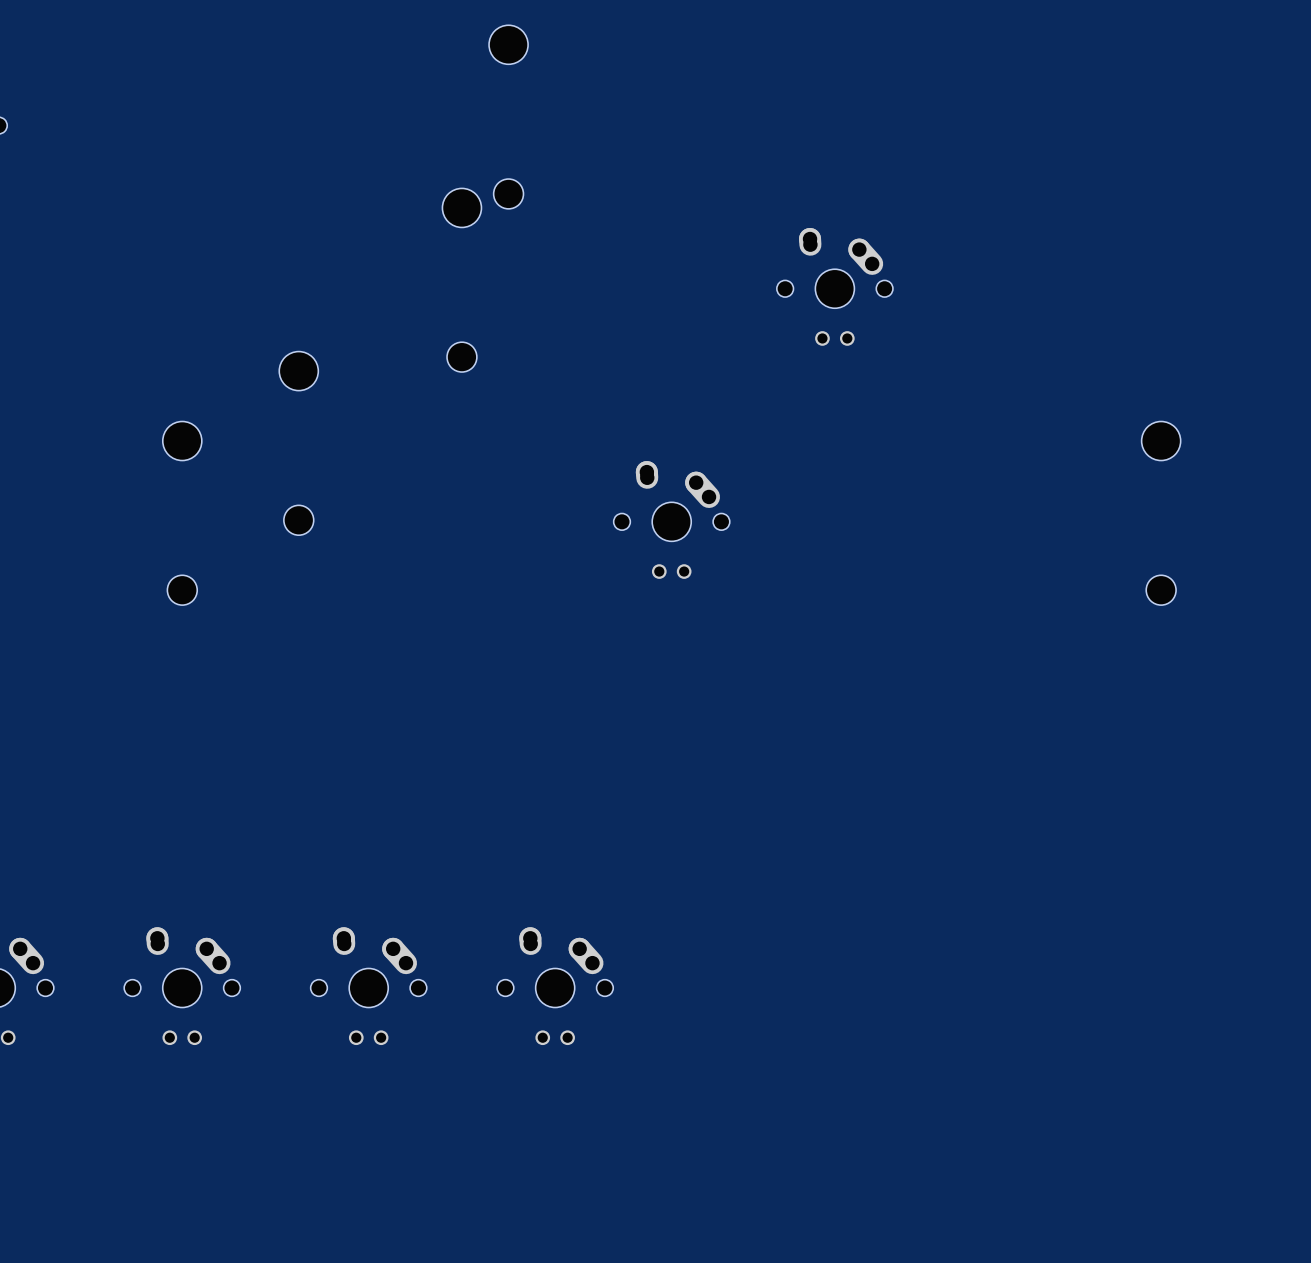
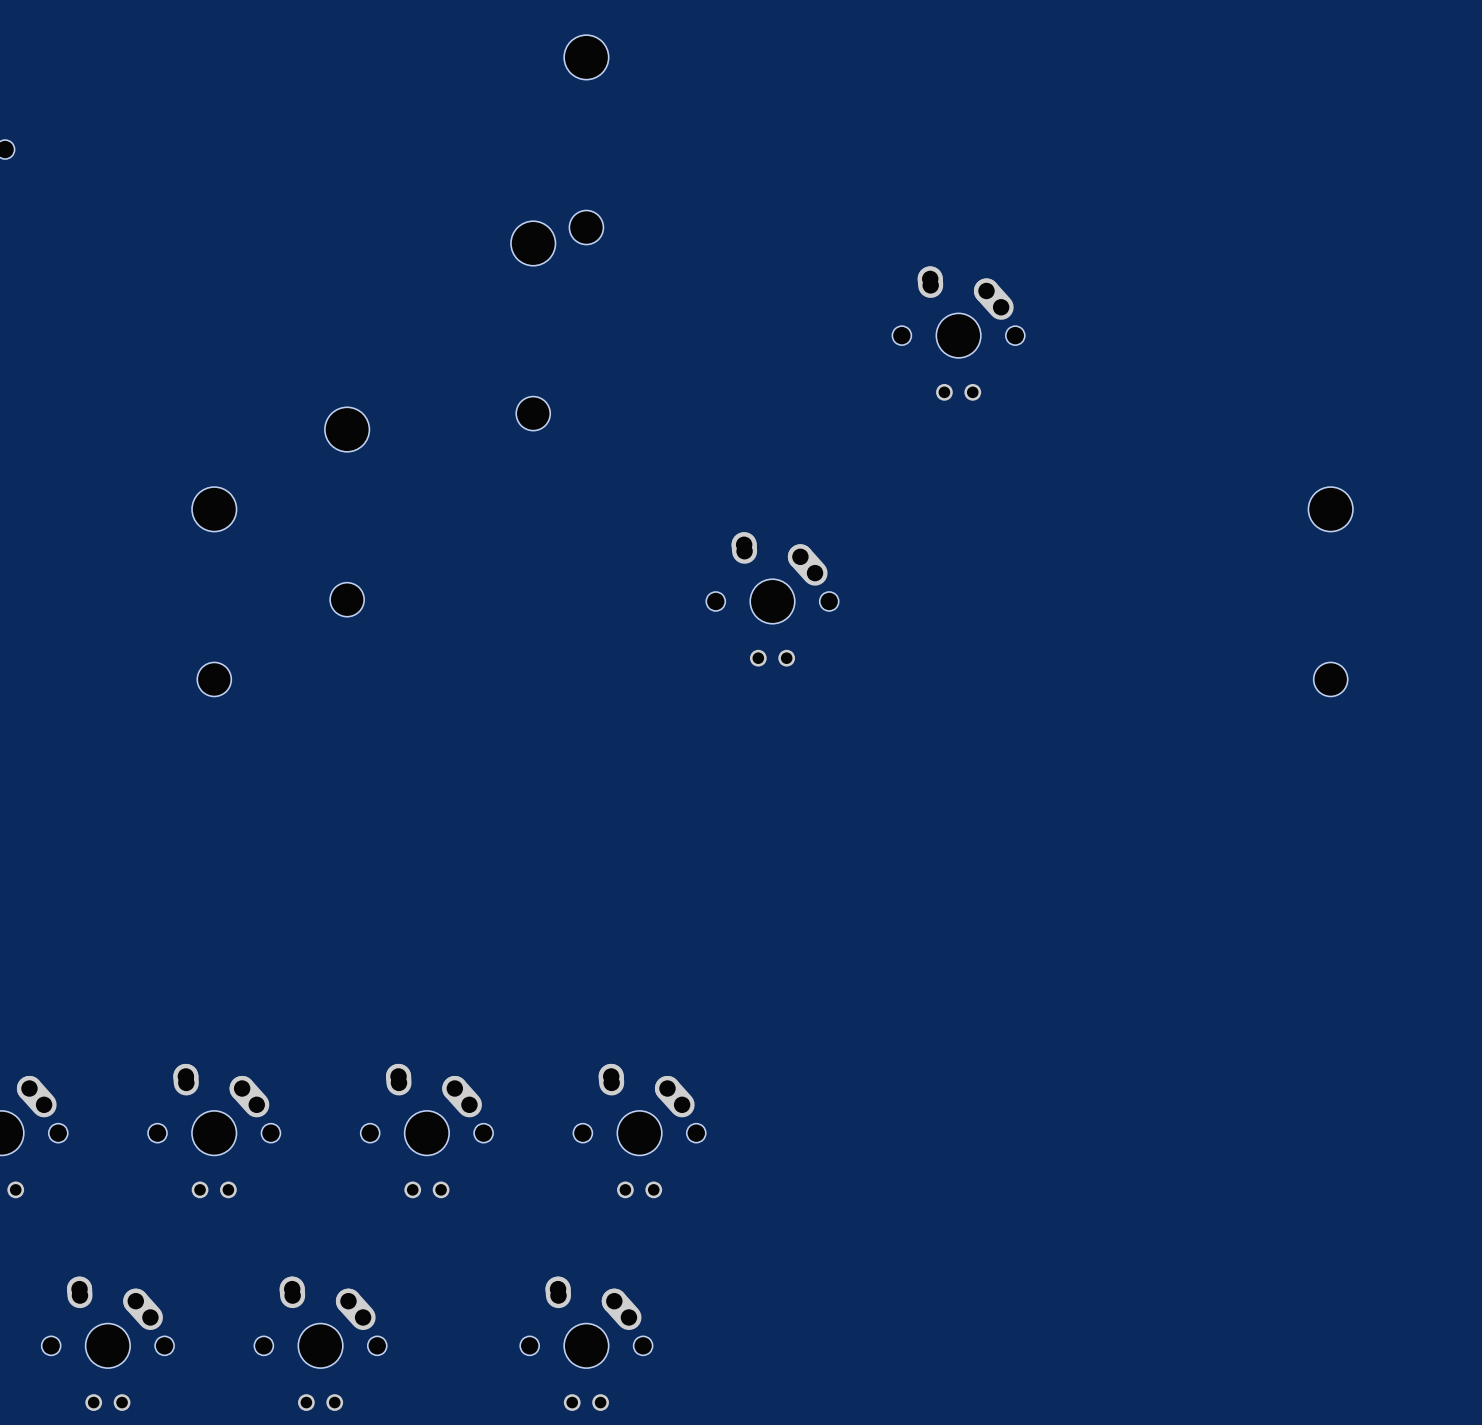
part: none -> (107, 1343)
part: none -> (320, 1343)
part: none -> (586, 1343)

